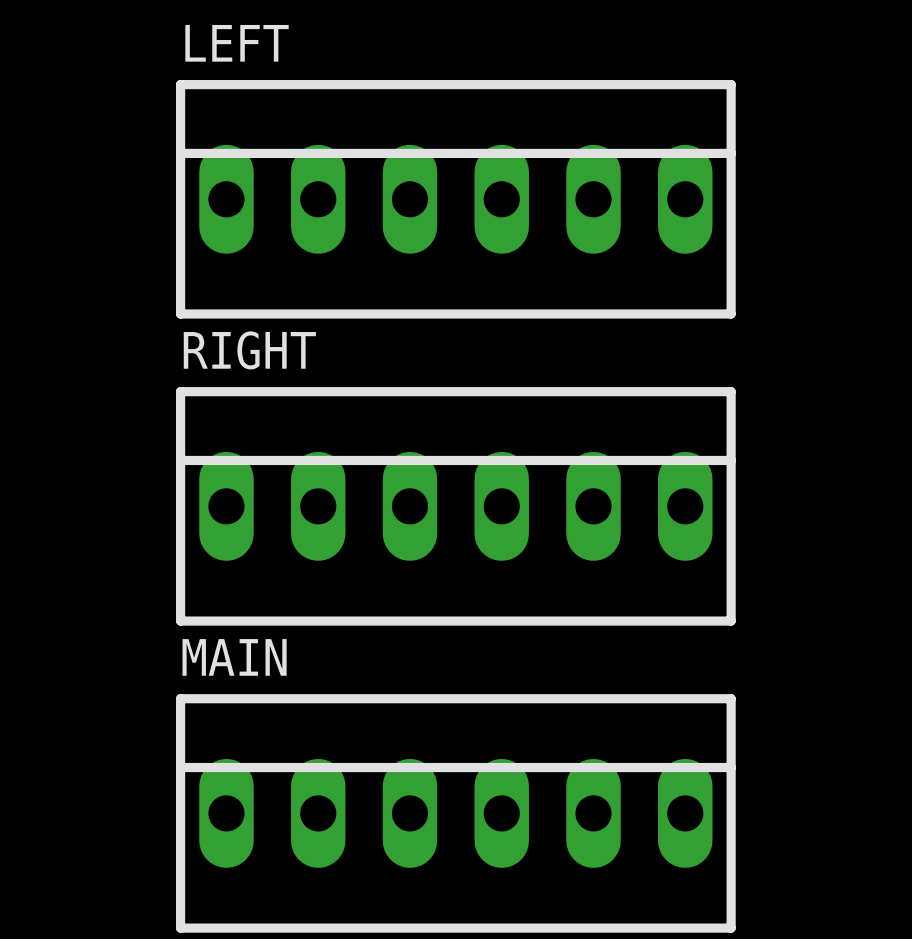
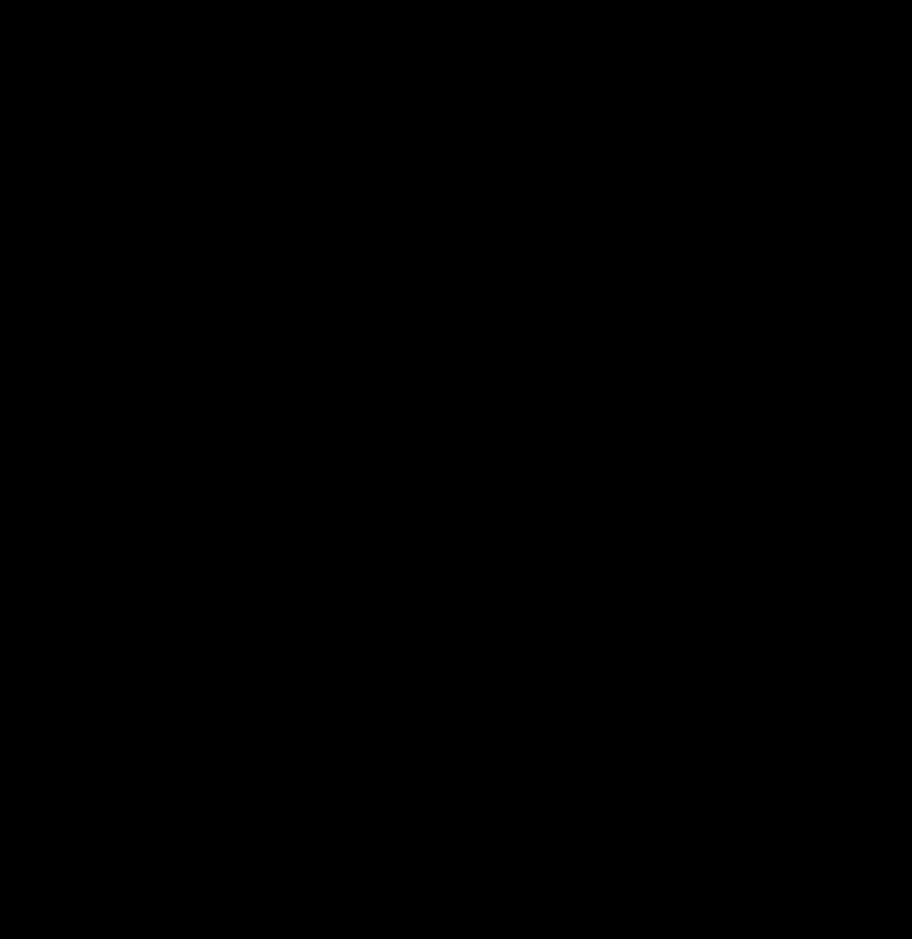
LEFT: (455, 199) -> none
RIGHT: (455, 506) -> none
MAIN: (455, 813) -> none

